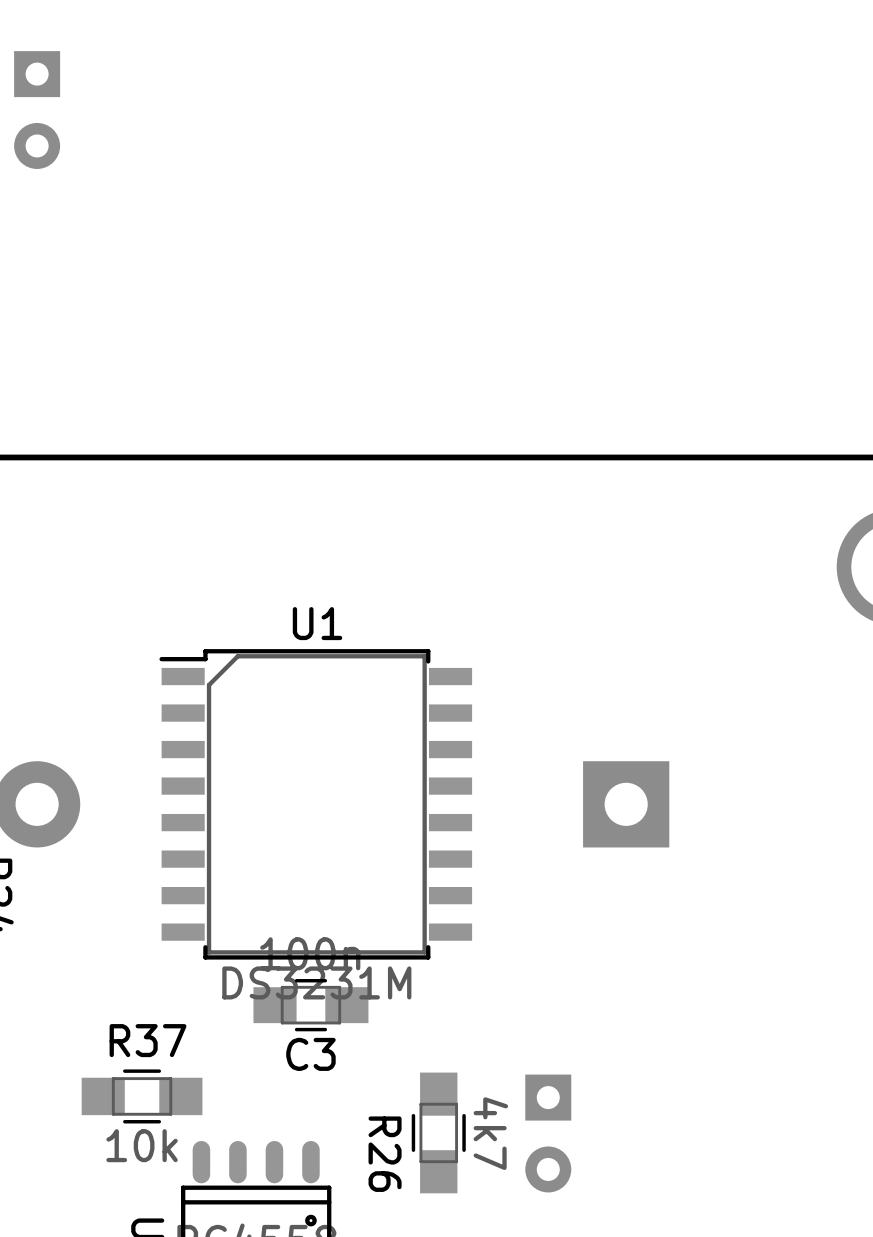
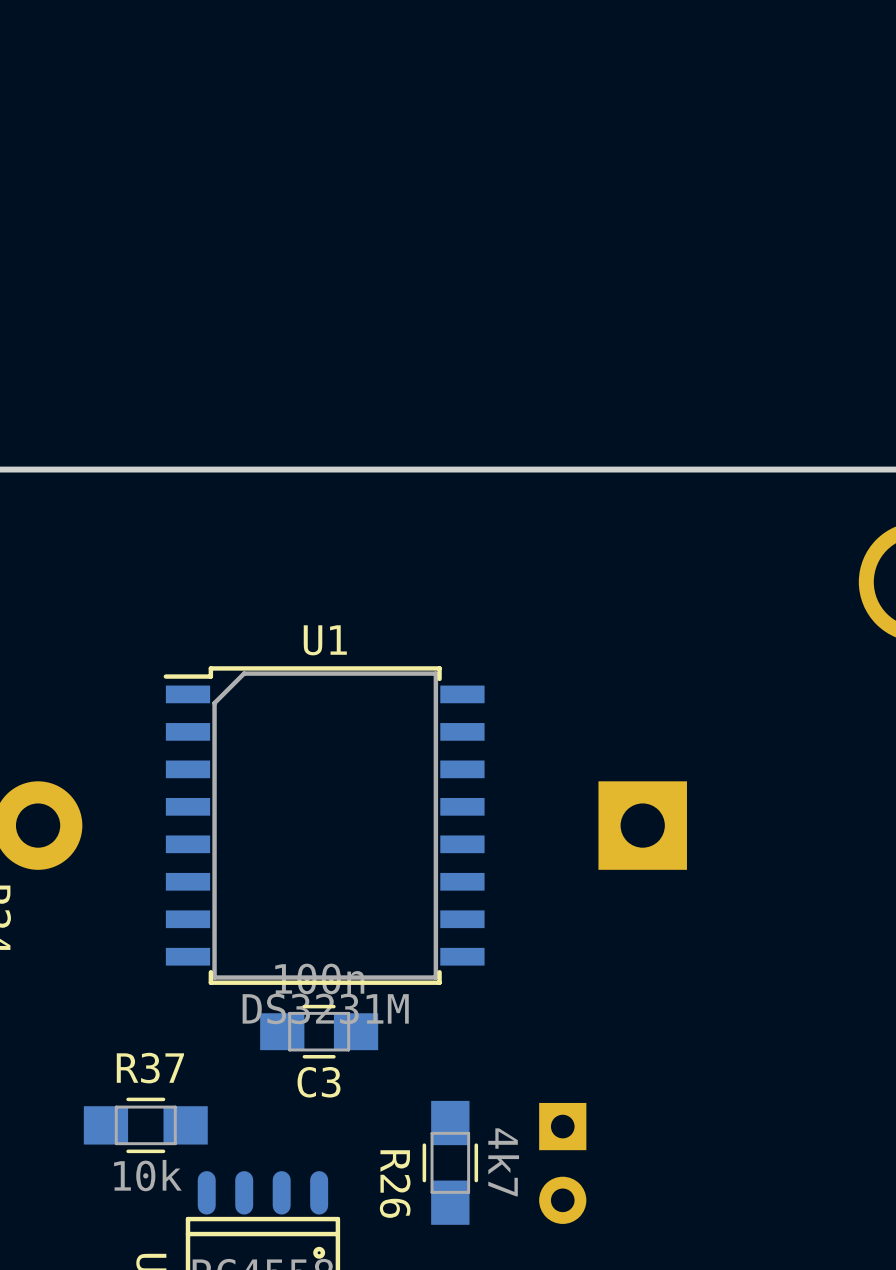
part: (37, 110) -> none

